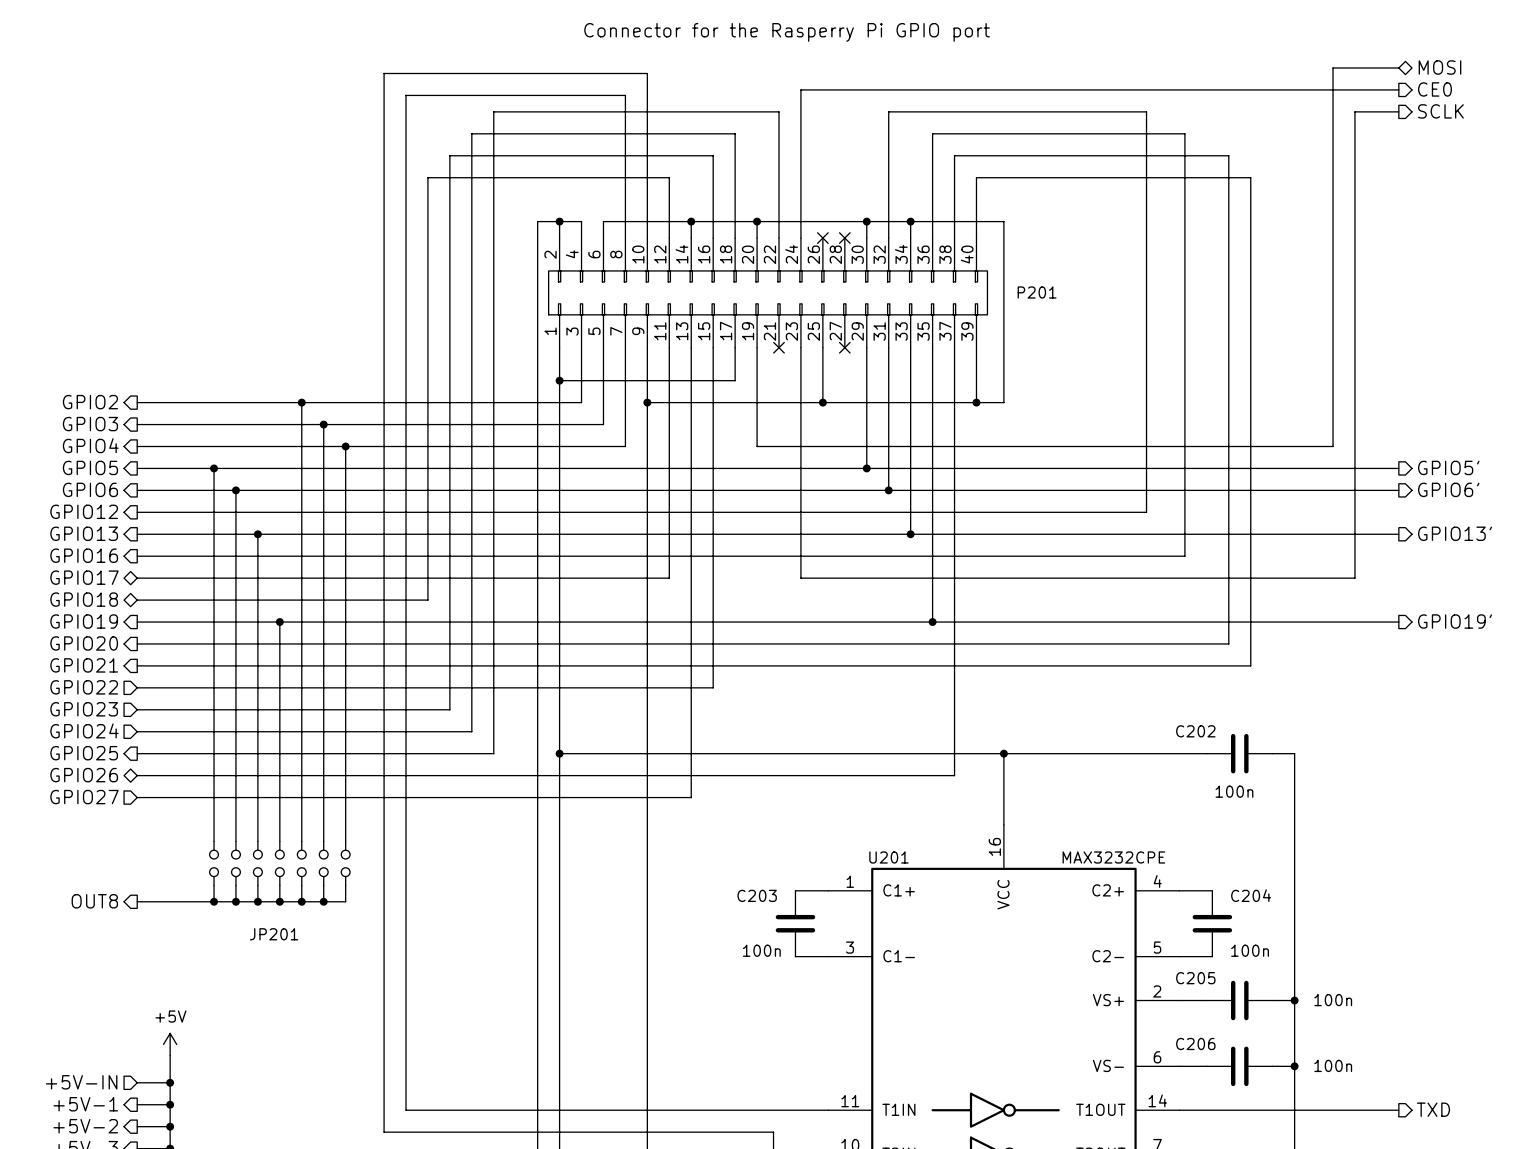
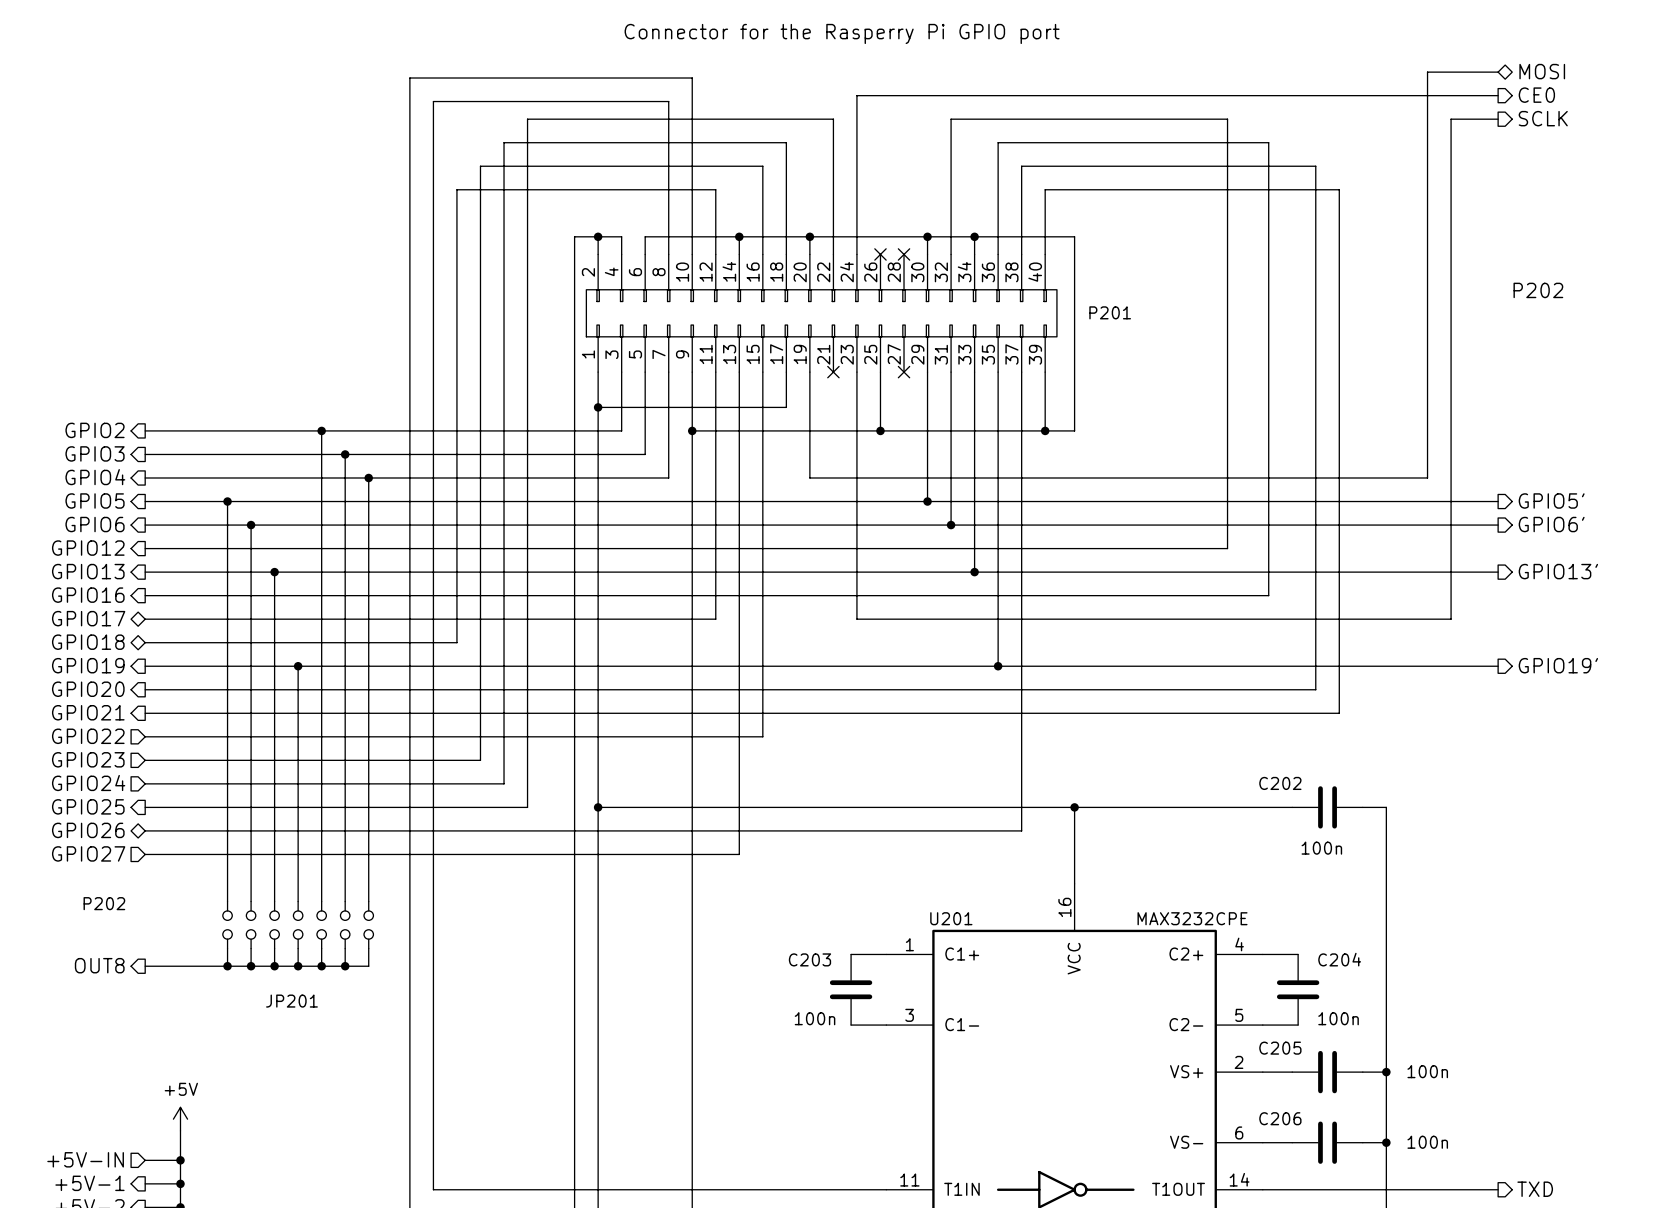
text: none -> P202 (1538, 290)
text: none -> P202 (104, 903)

